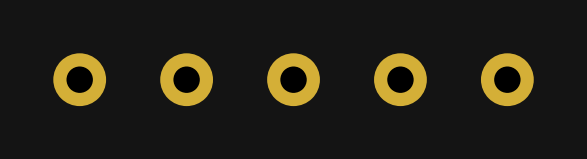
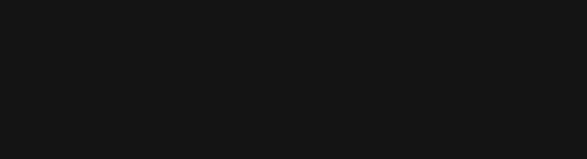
part: (79, 79) -> none
part: (186, 79) -> none
part: (293, 79) -> none
part: (400, 79) -> none
part: (507, 79) -> none

